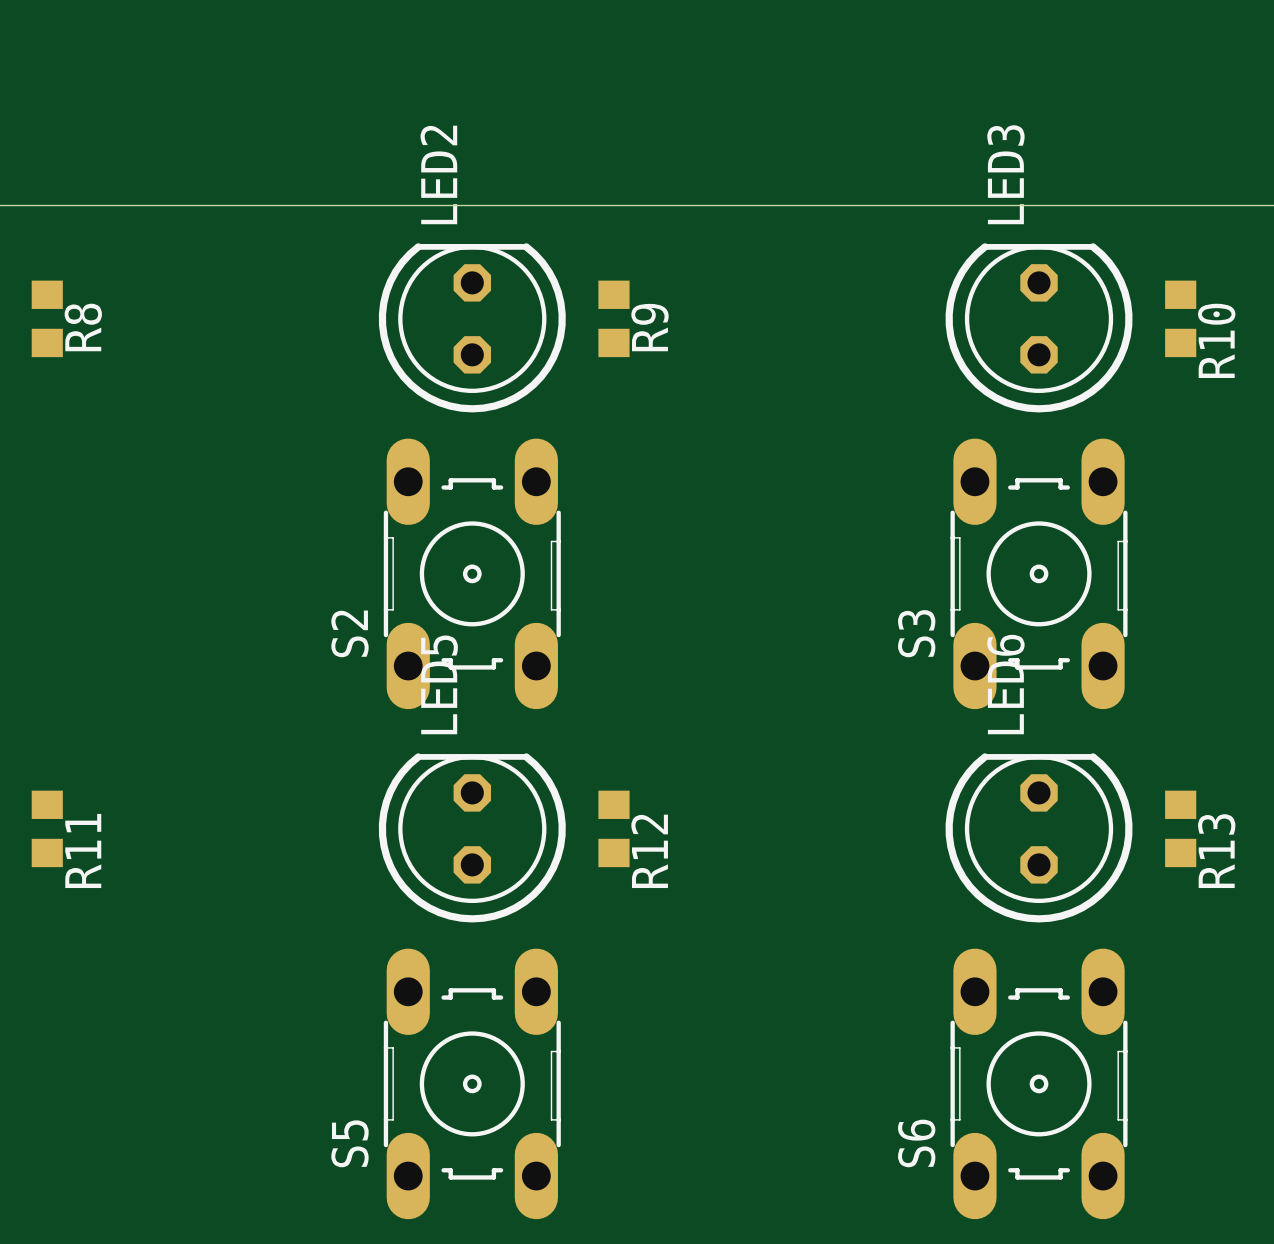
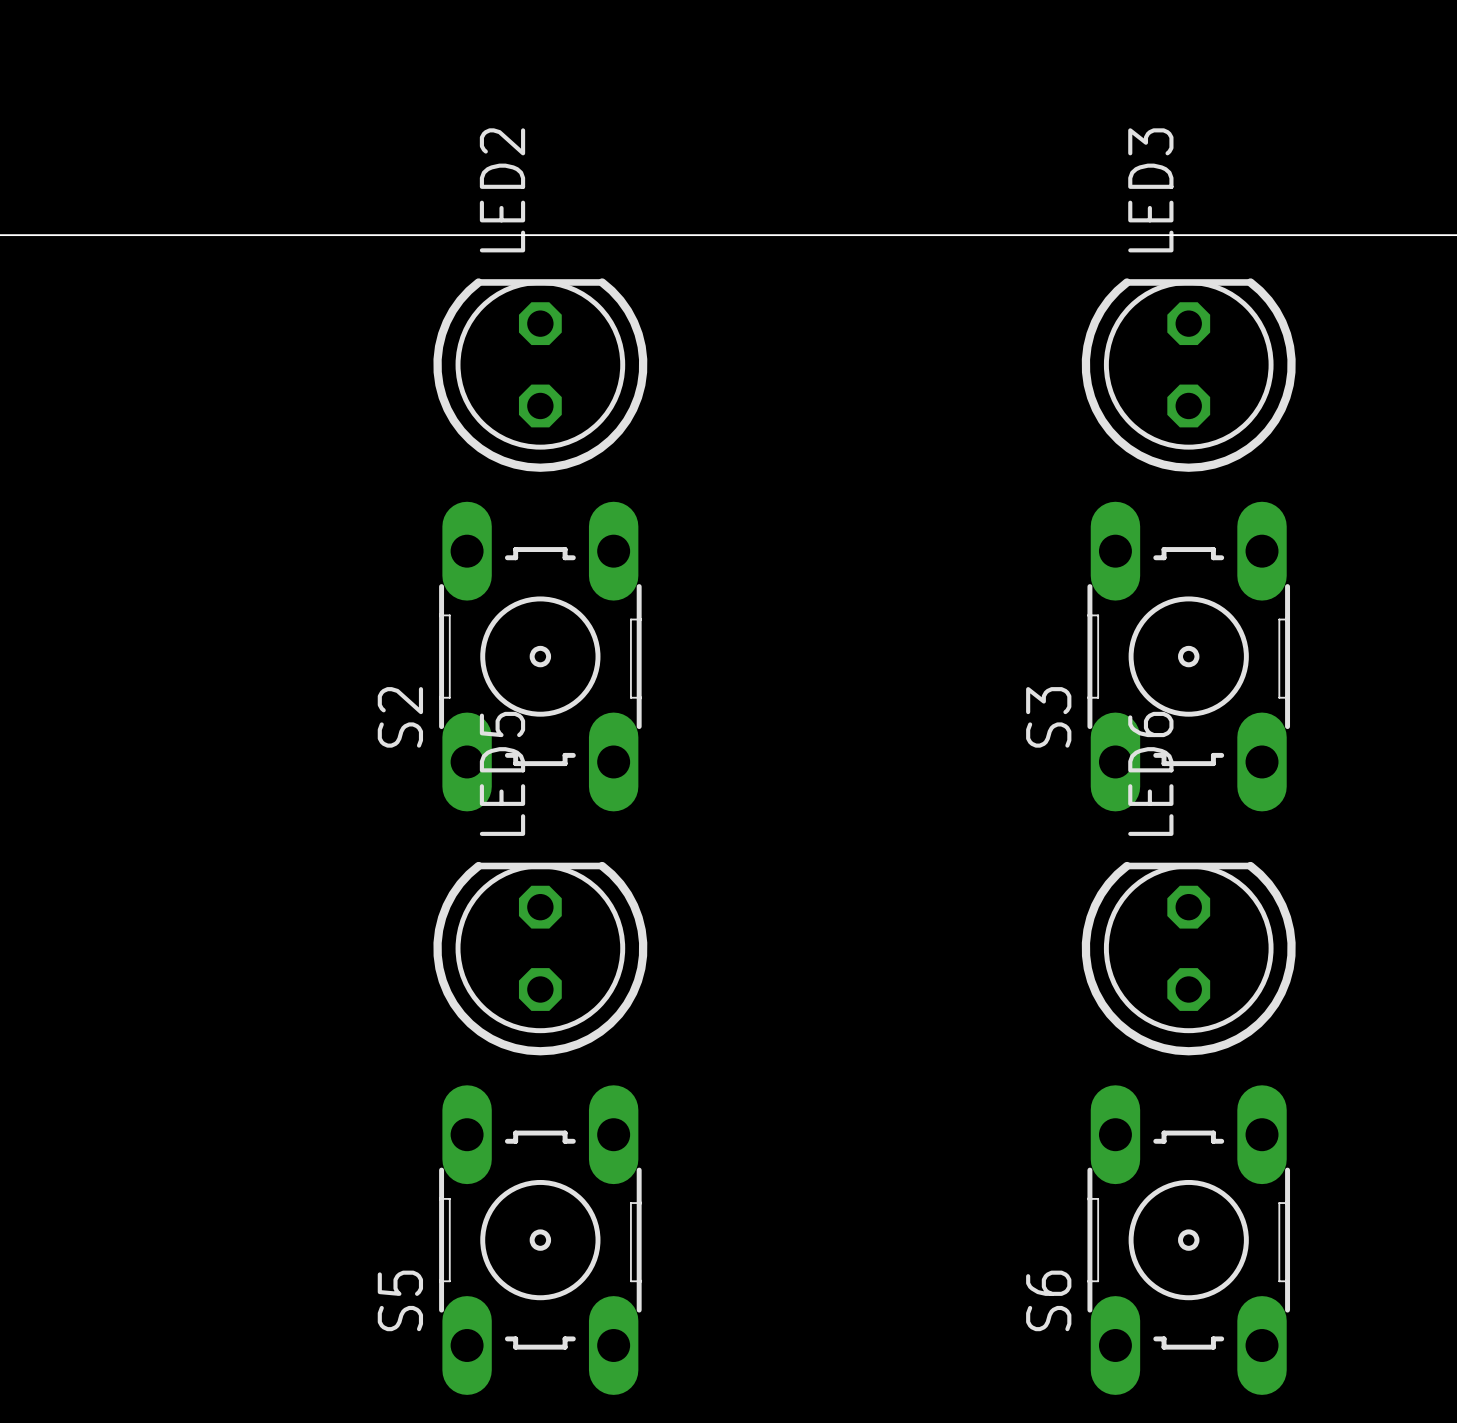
R8: (47, 318) -> none
R9: (613, 318) -> none
R10: (1180, 318) -> none
R11: (47, 828) -> none
R12: (613, 828) -> none
R13: (1180, 828) -> none

